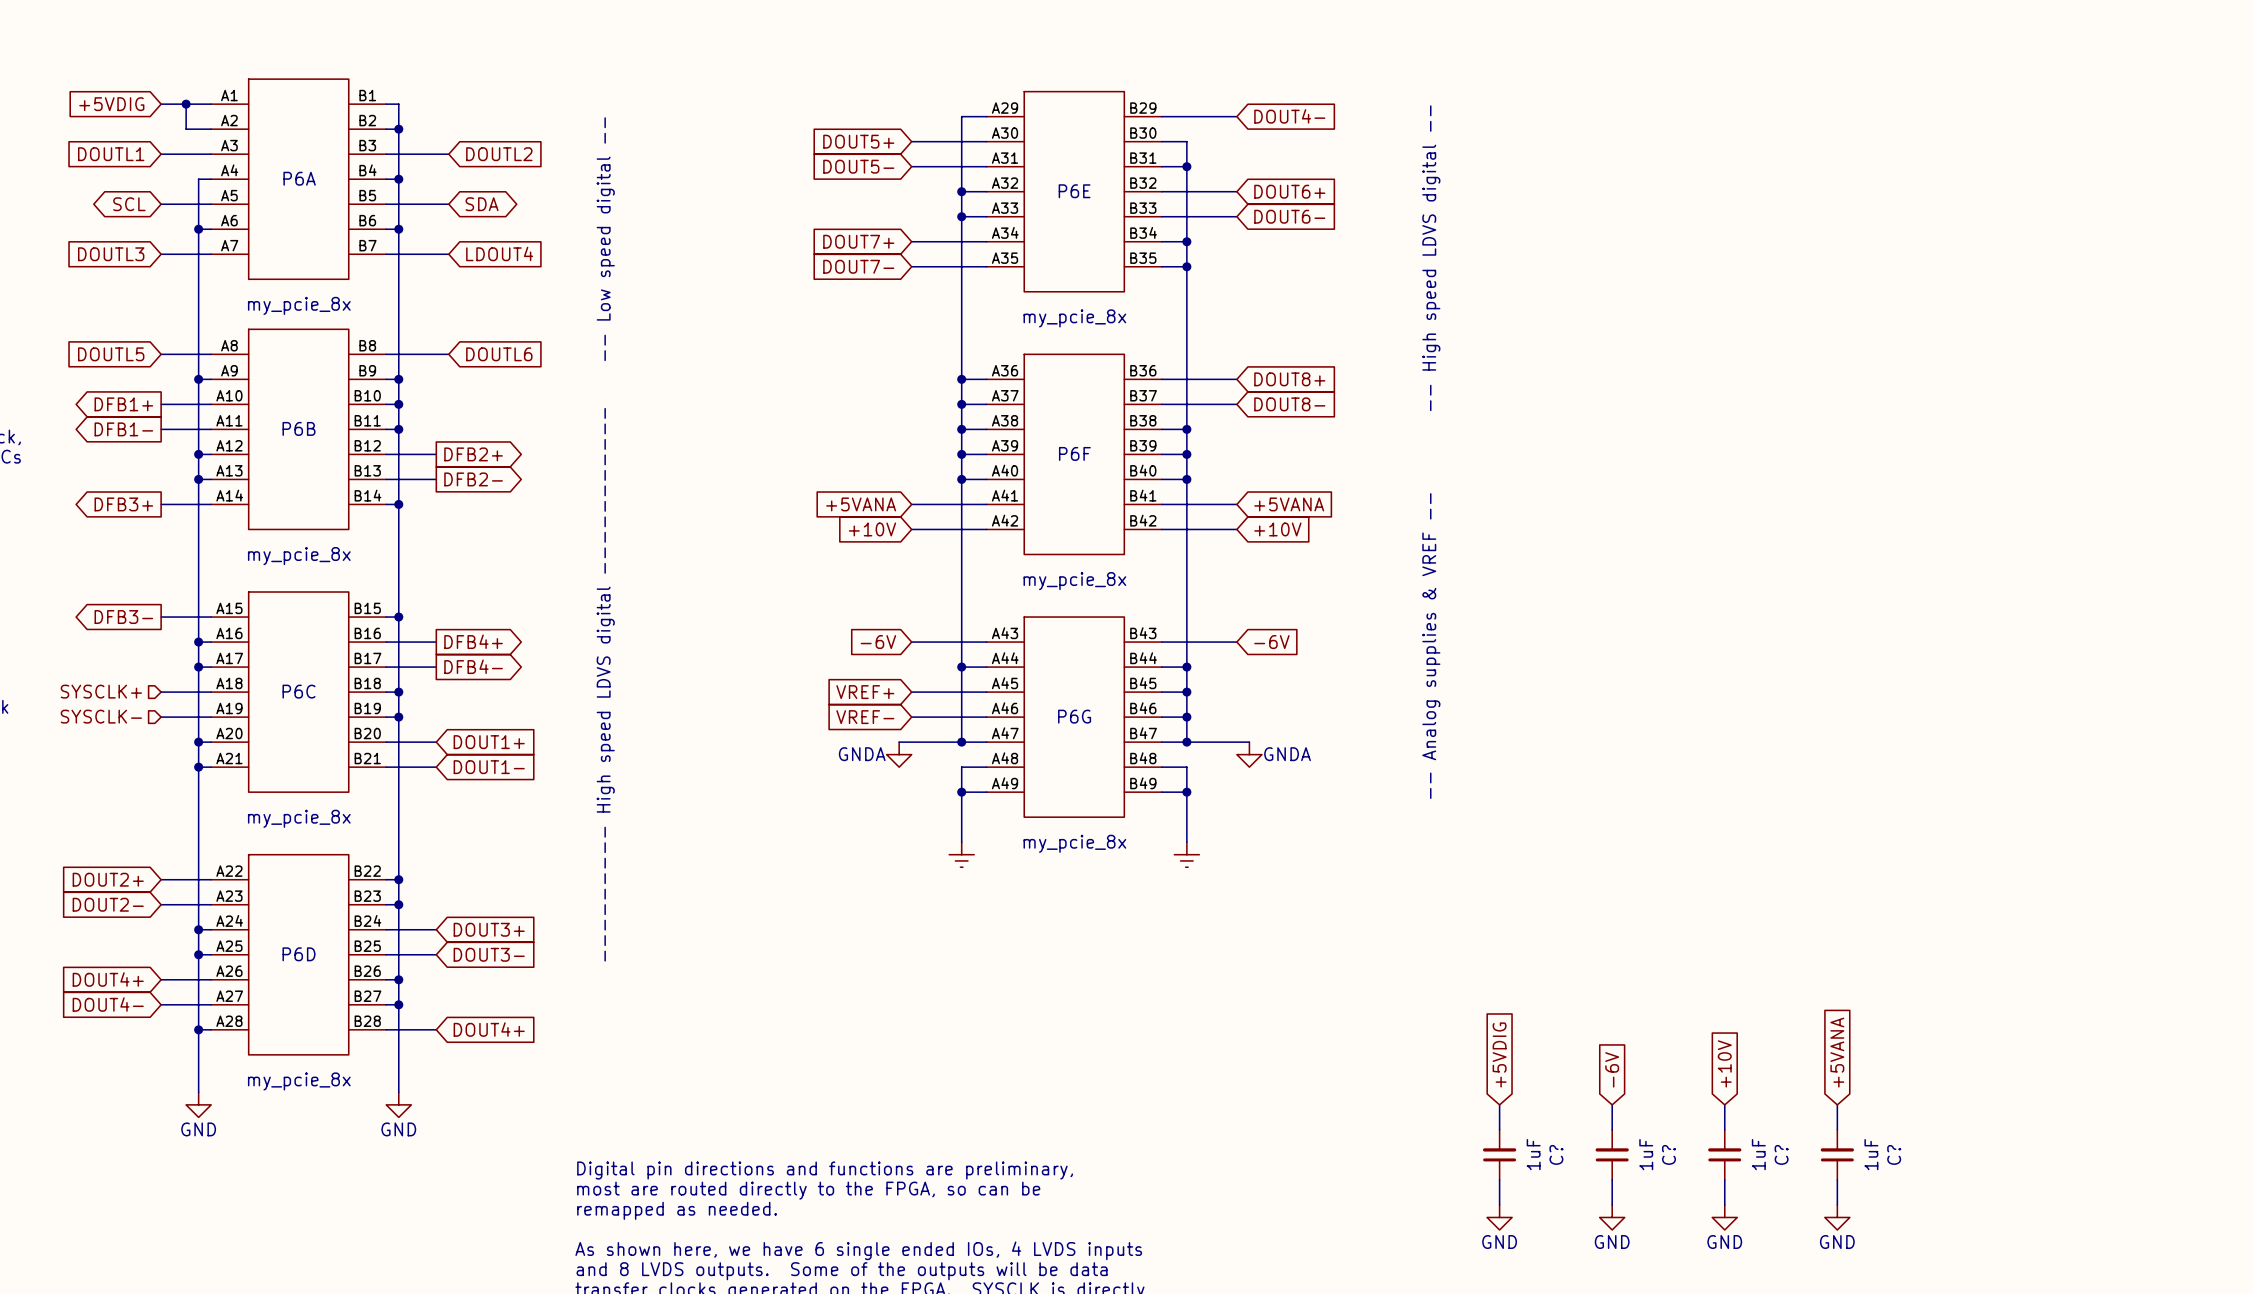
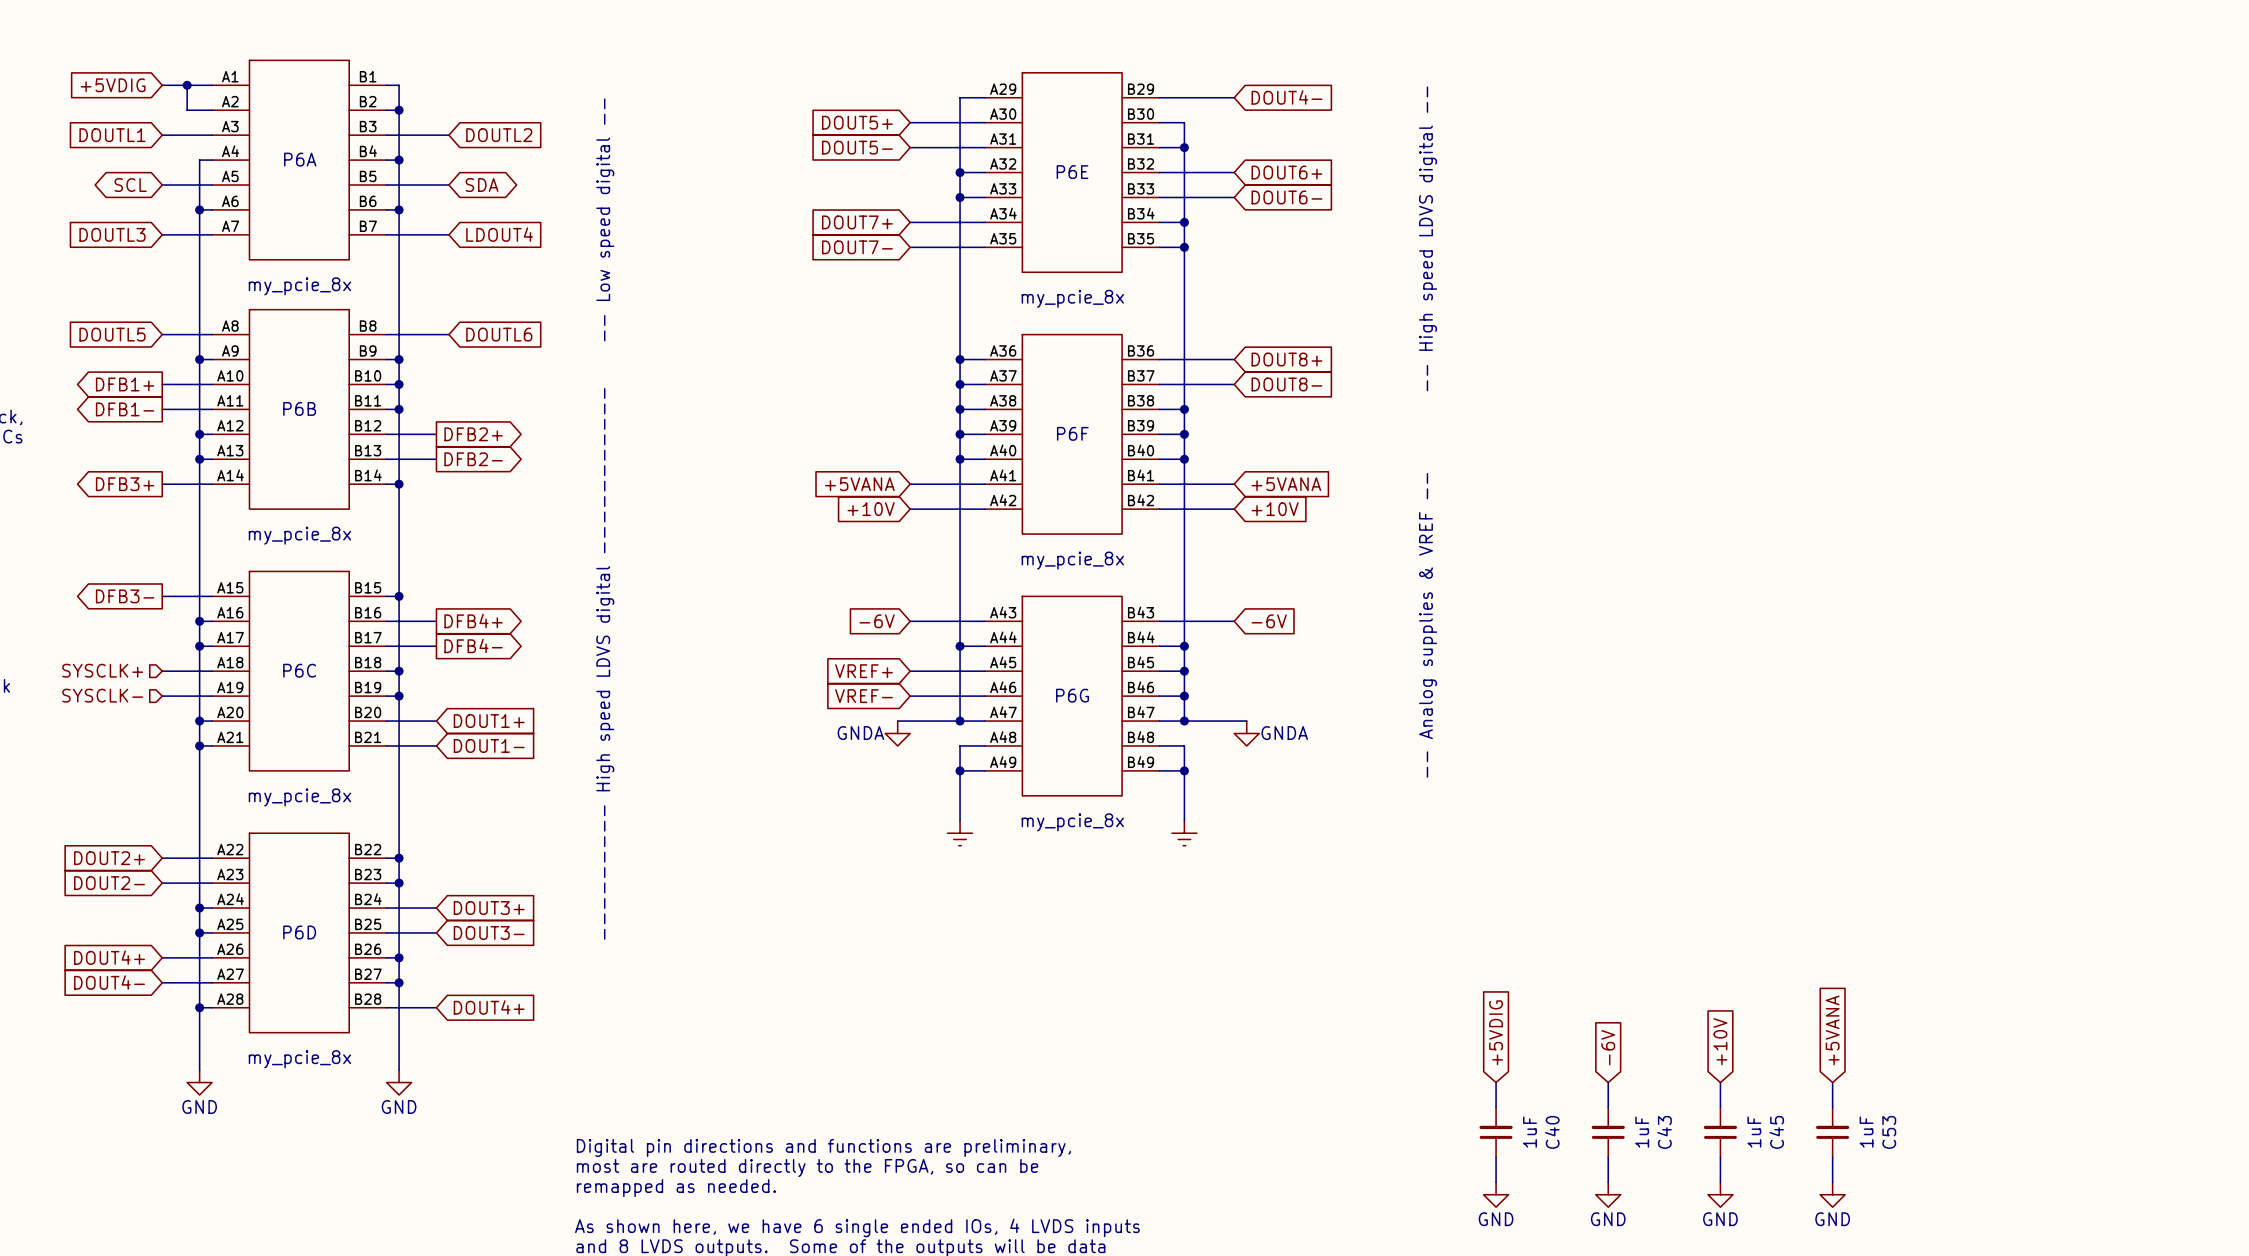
C? name: C? (1556, 1154) -> C40 (1552, 1132)
C? name: C? (1669, 1154) -> C43 (1664, 1132)
C? name: C? (1781, 1154) -> C45 (1776, 1132)
C? name: C? (1894, 1154) -> C53 (1889, 1132)

